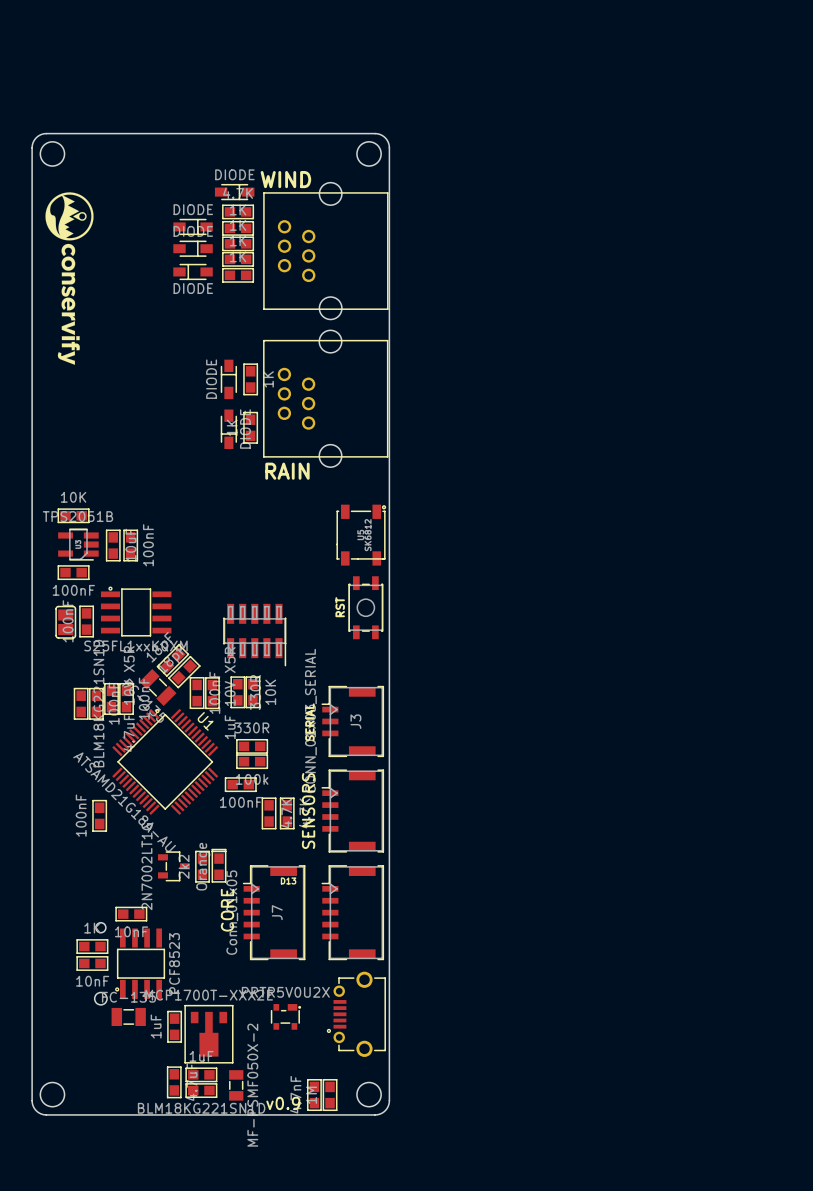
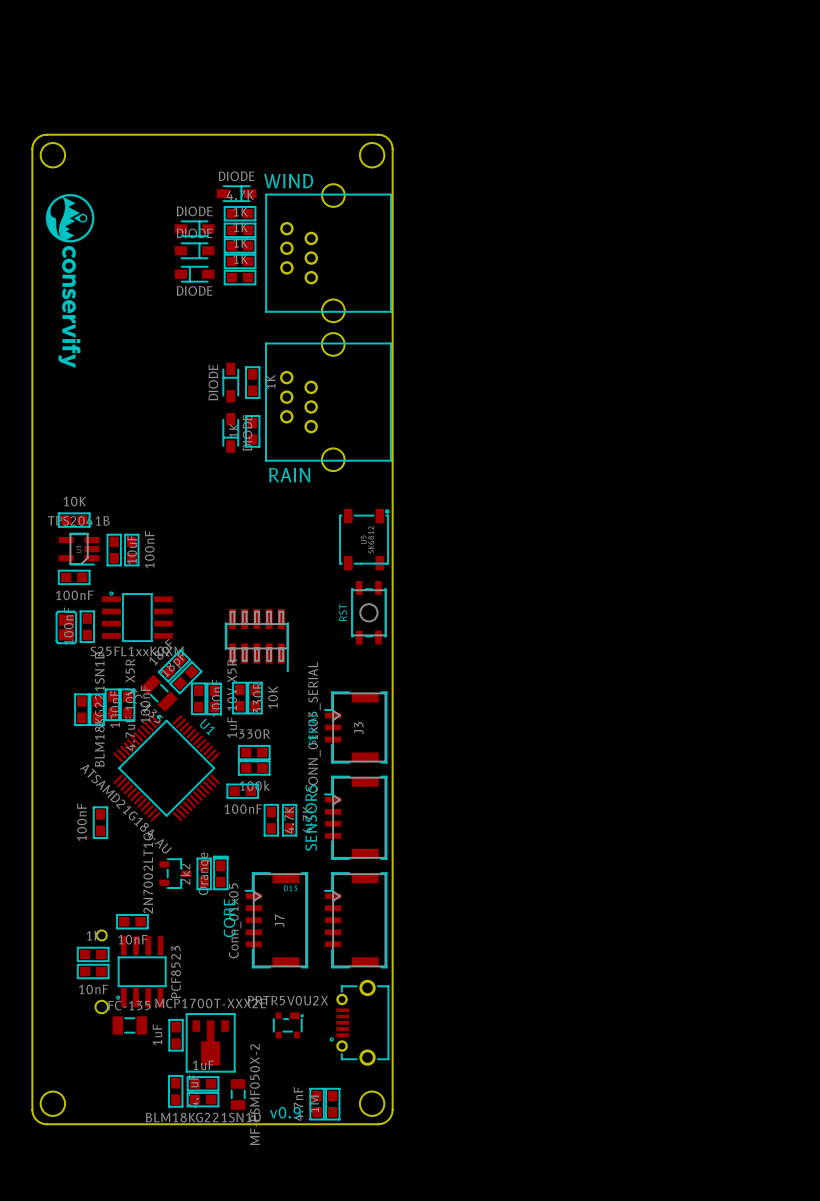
part value: TPS2051B (77, 516) -> TPS2041B (78, 520)

